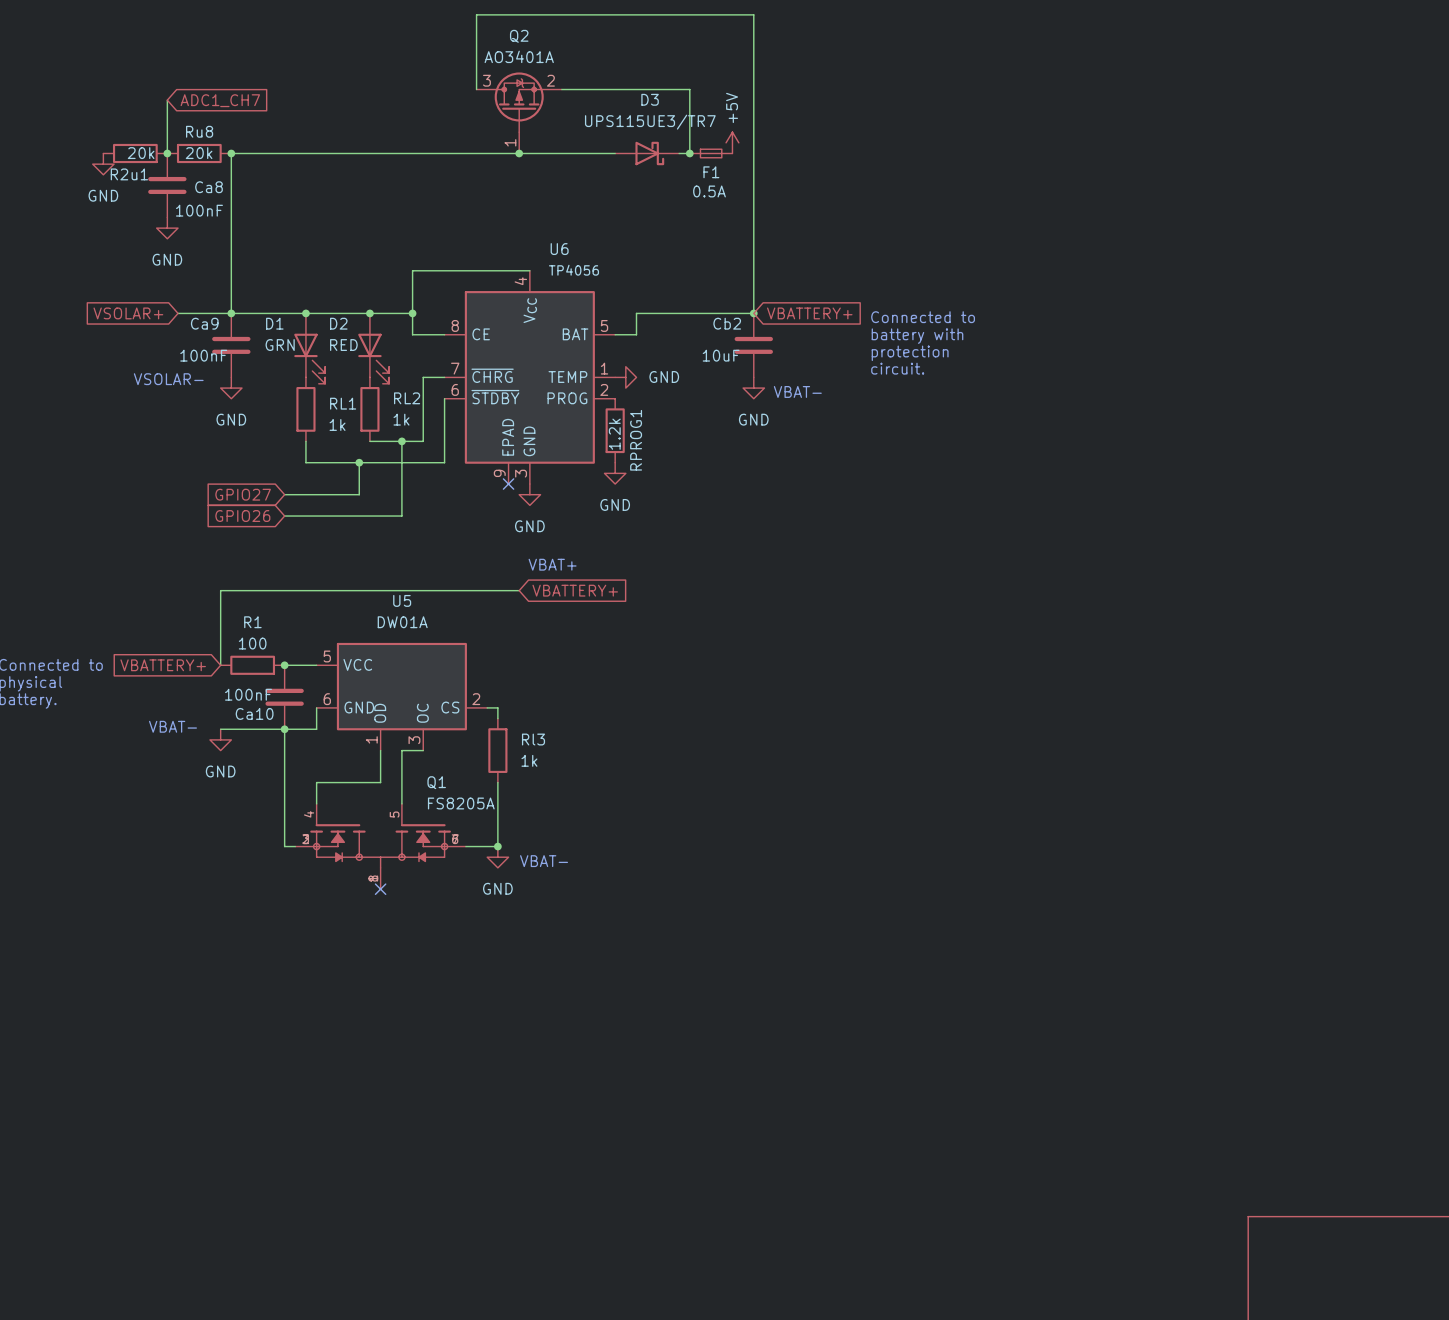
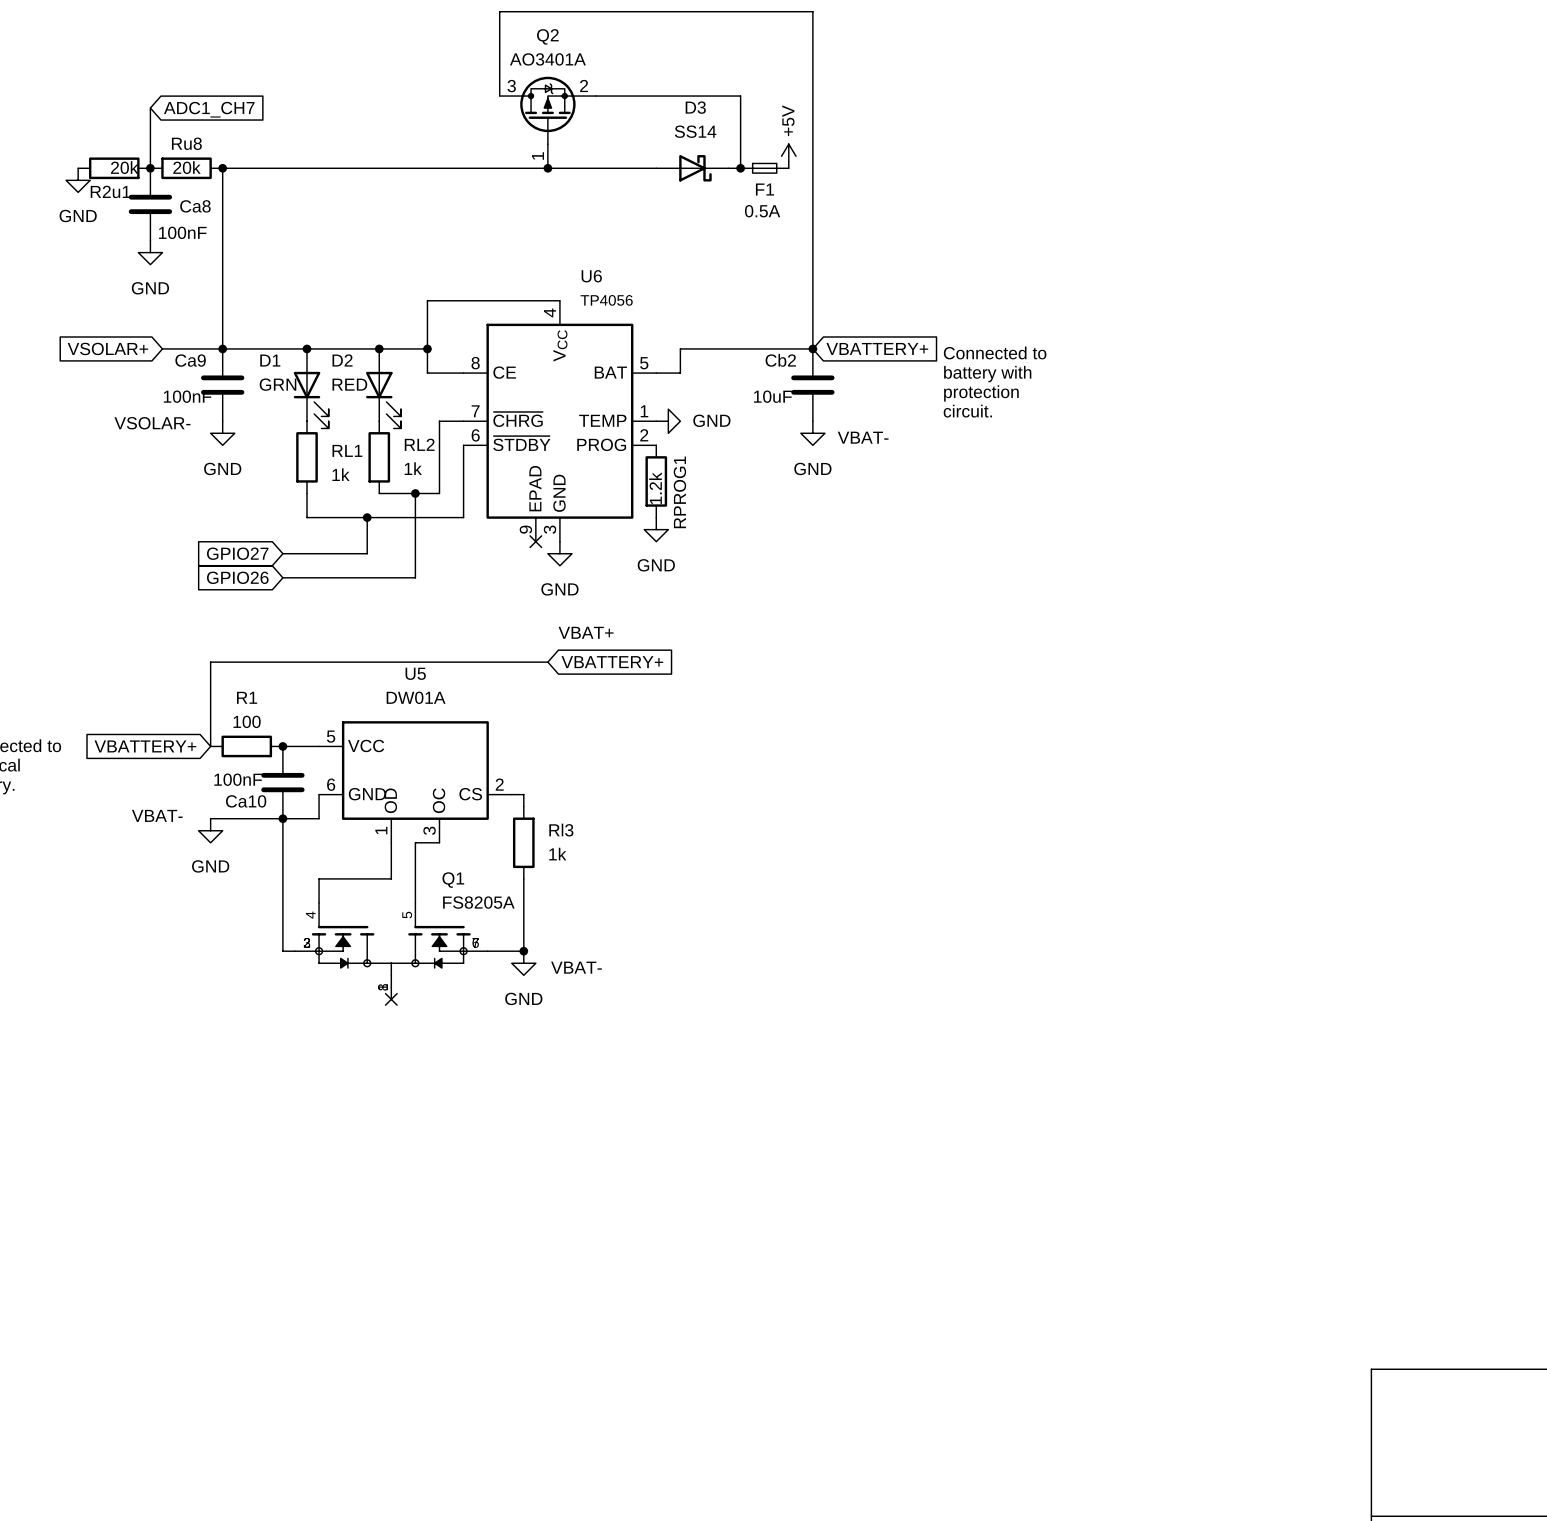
D3 value: UPS115UE3/TR7 (650, 122) -> SS14 (695, 131)

